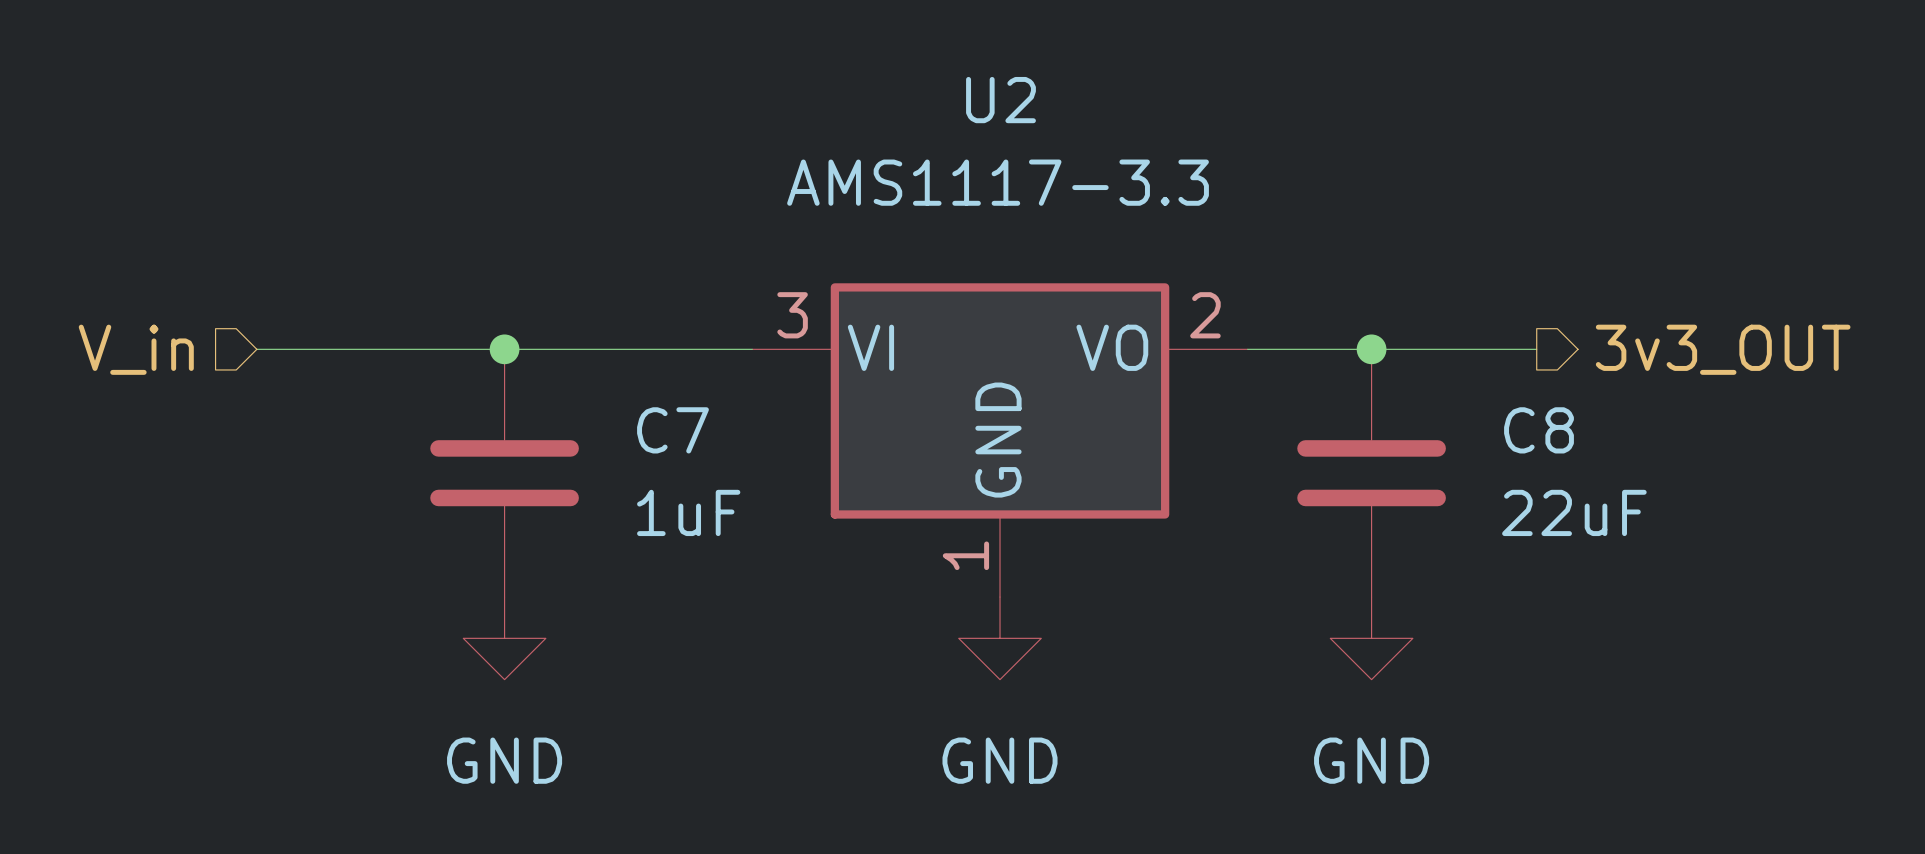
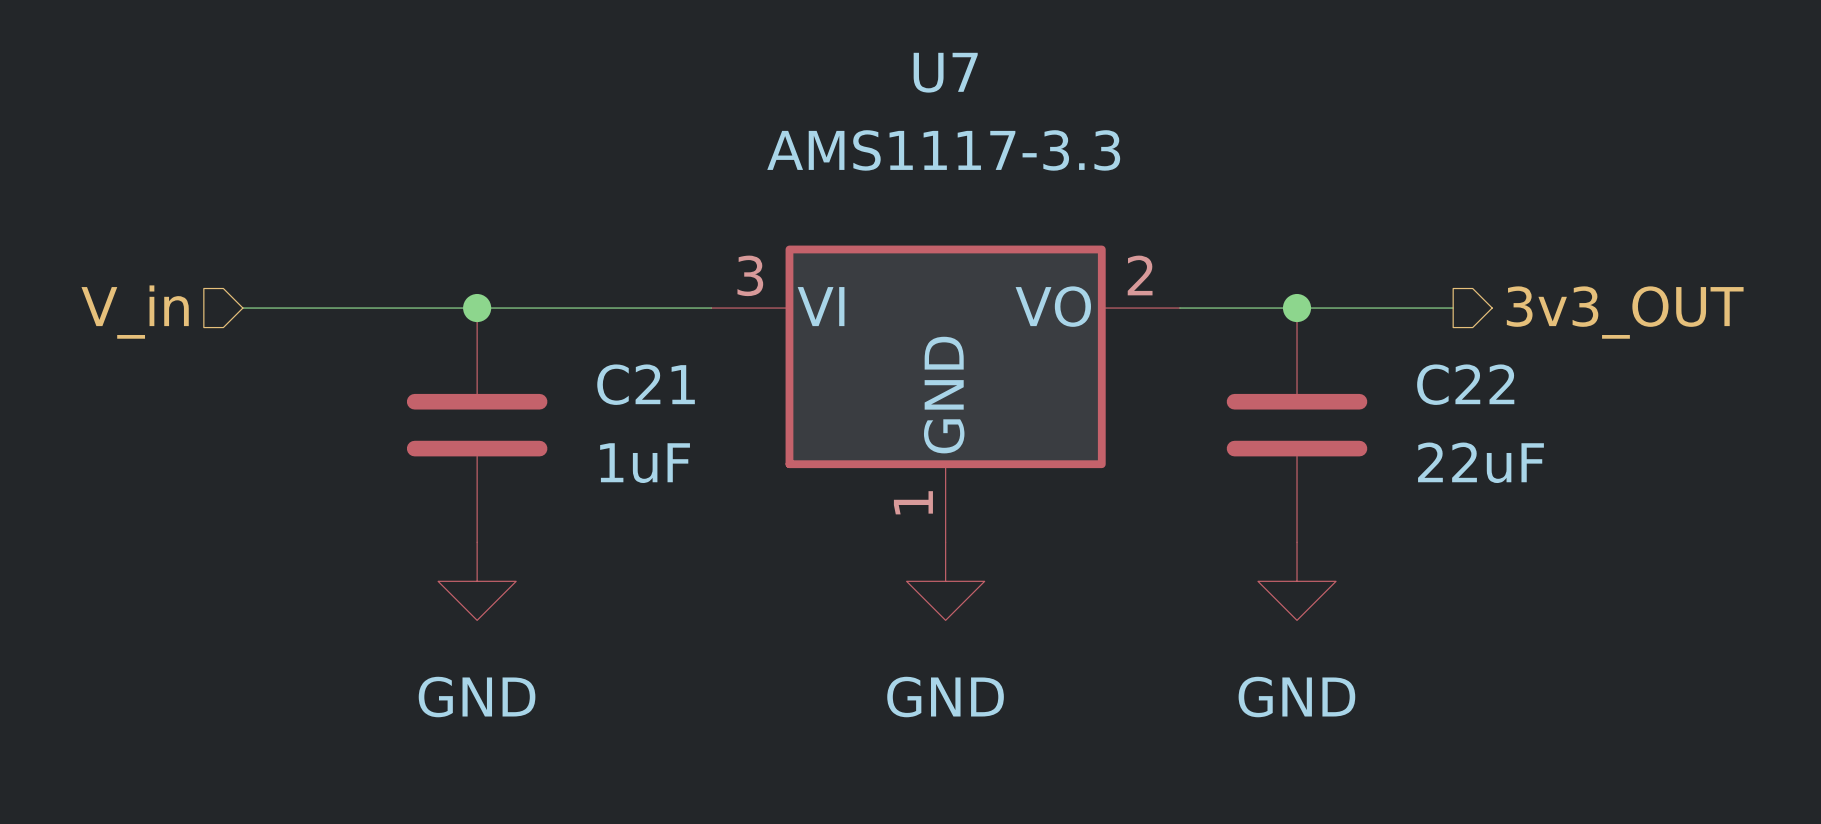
U2 name: U2 (1000, 100) -> U7 (945, 72)
C7 name: C7 (672, 430) -> C21 (646, 384)
C8 name: C8 (1539, 430) -> C22 (1465, 384)

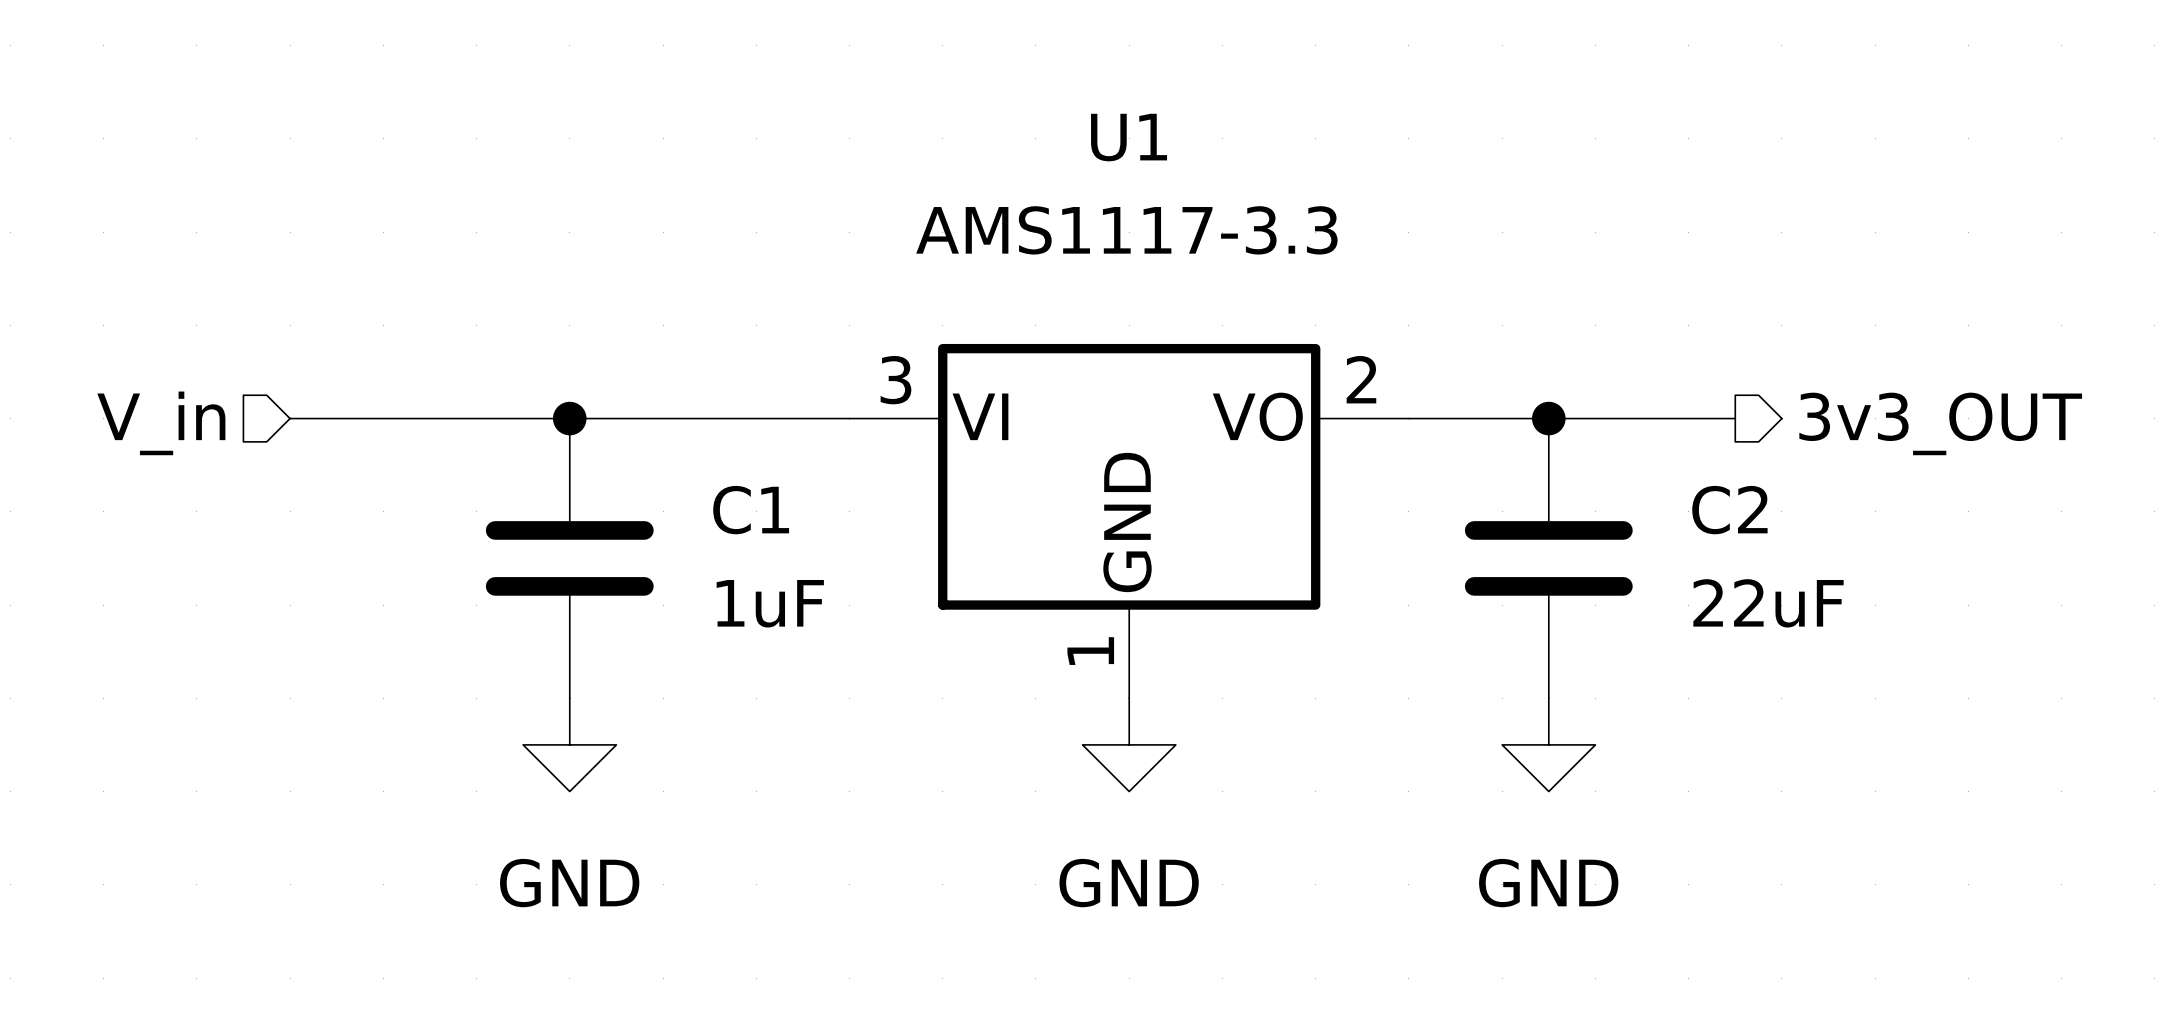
U7 name: U7 (945, 72) -> U1 (1129, 137)
C21 name: C21 (646, 384) -> C1 (751, 510)
C22 name: C22 (1465, 384) -> C2 (1729, 510)

